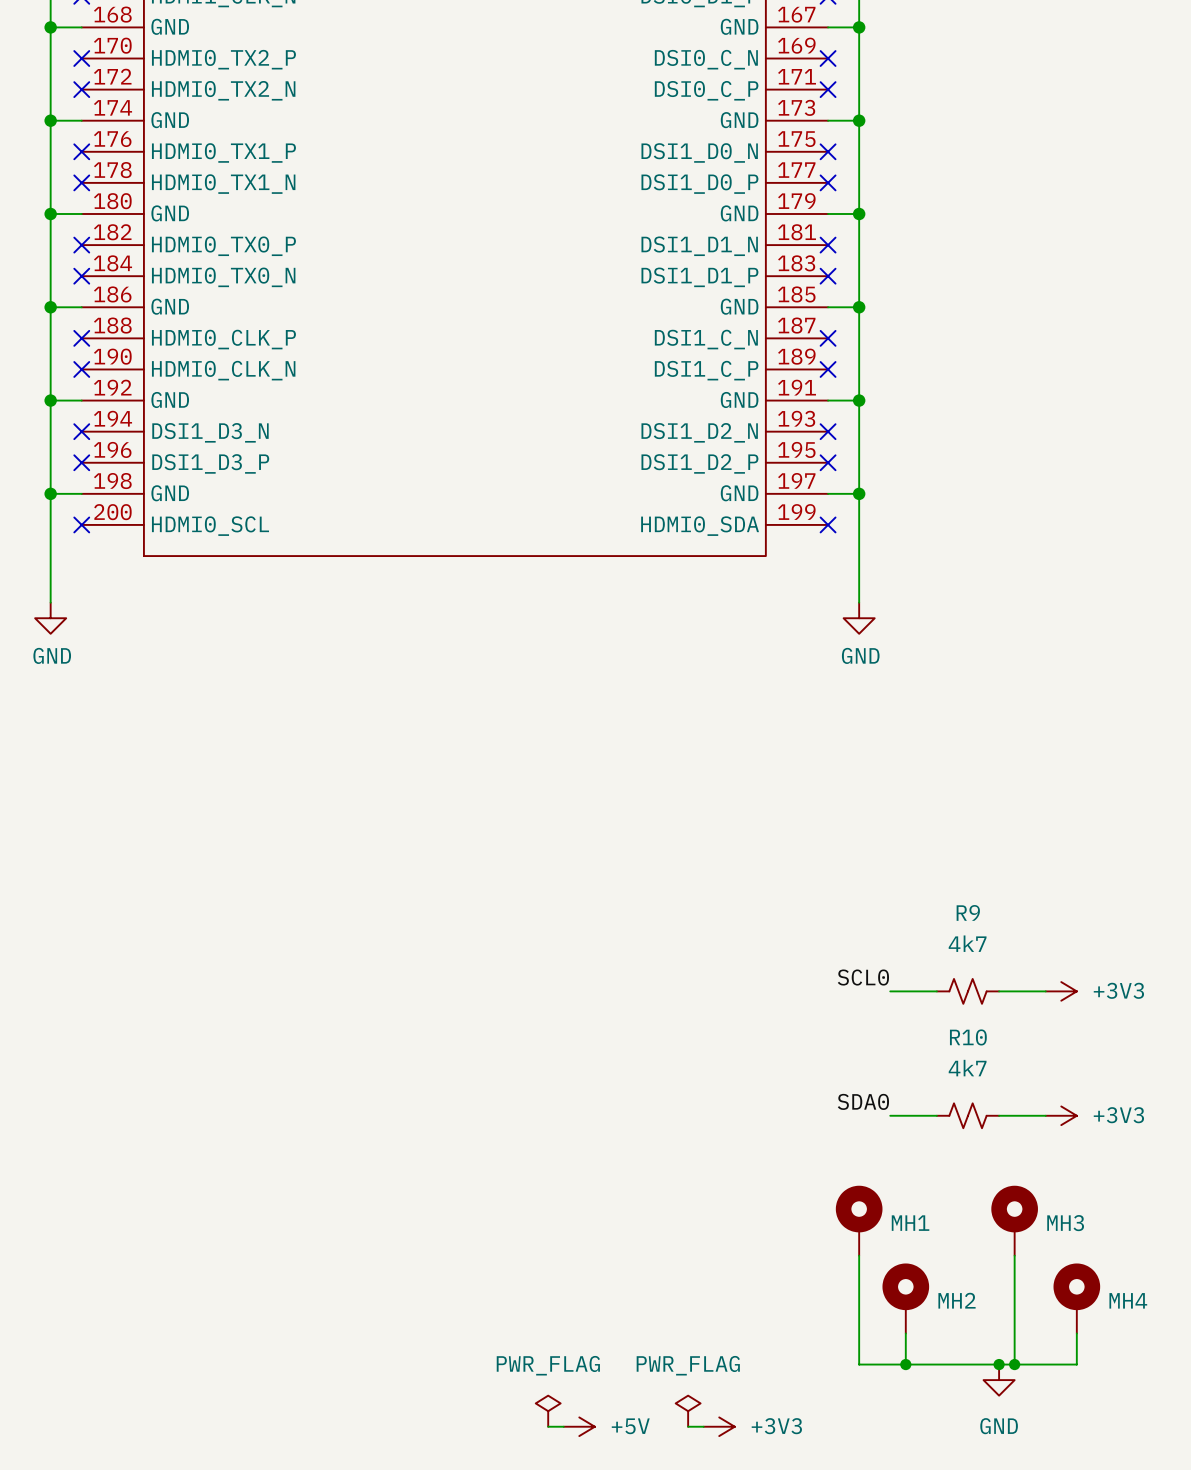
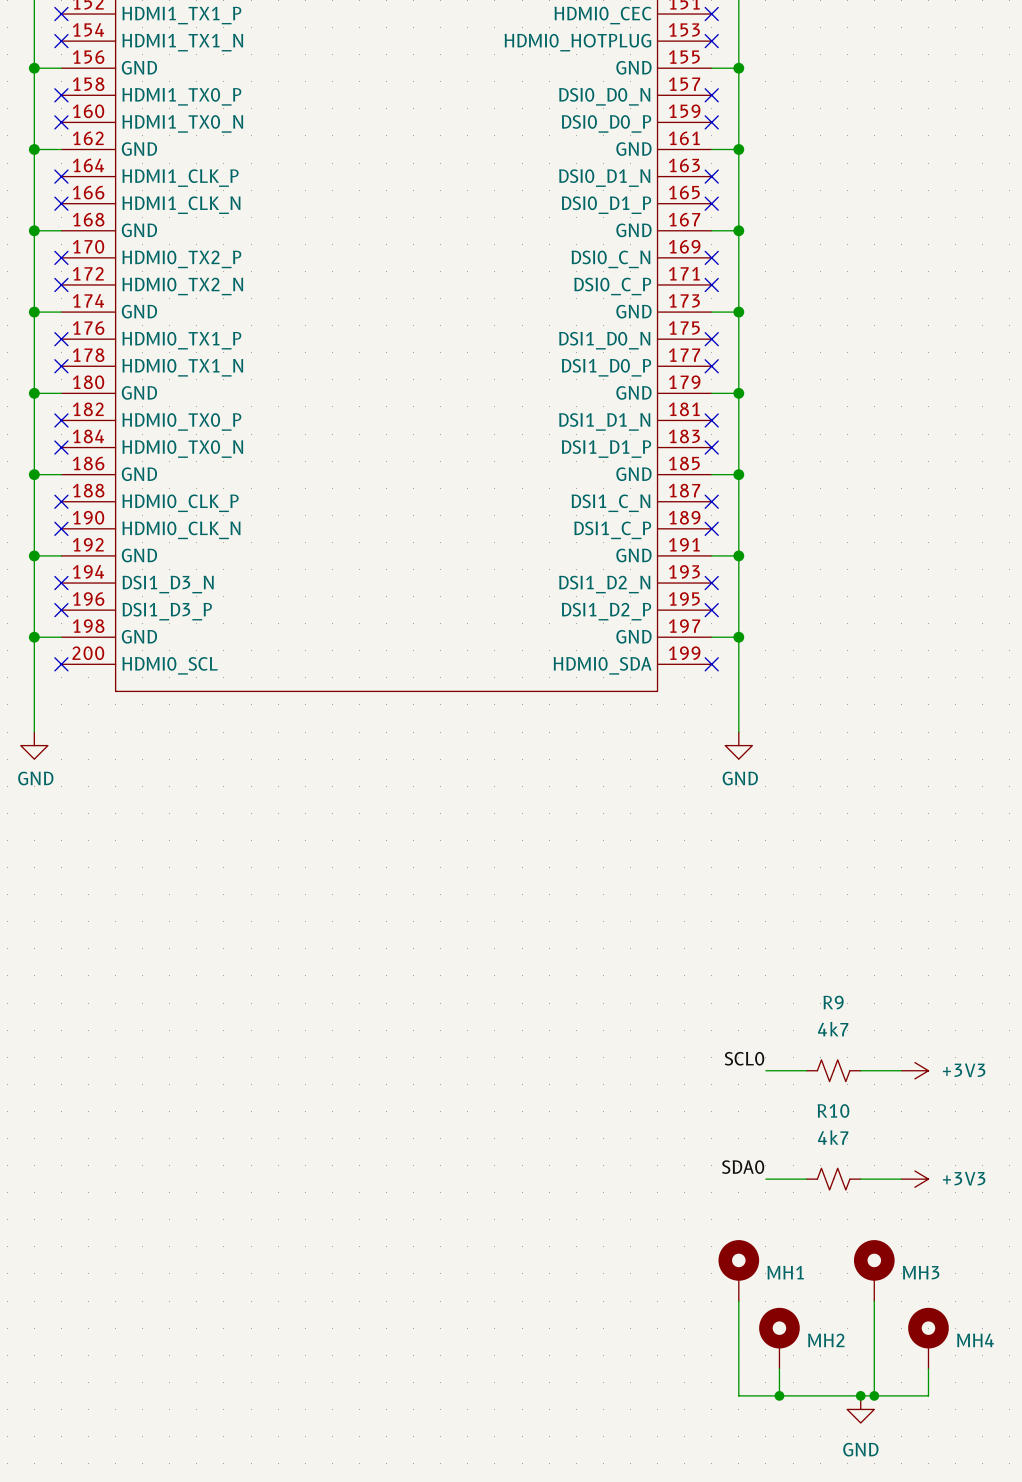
power symbol: PWR_FLAG (548, 1411) -> none
power symbol: PWR_FLAG (688, 1411) -> none
wire: (548, 1426) (563, 1426) -> none
power symbol: +5V (579, 1426) -> none
wire: (688, 1426) (703, 1426) -> none
power symbol: +3V3 (719, 1426) -> none

